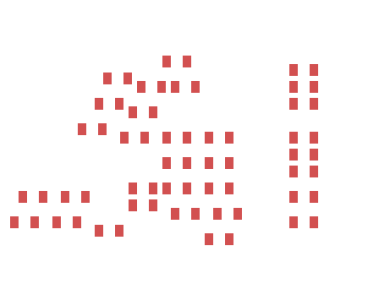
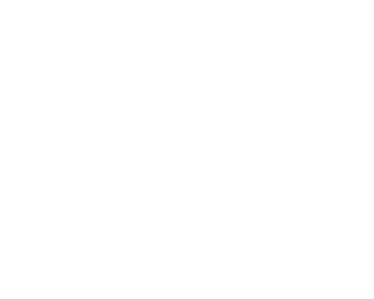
part: (176, 61) -> none
part: (303, 69) -> none
part: (117, 78) -> none
part: (151, 86) -> none
part: (185, 86) -> none
part: (303, 86) -> none
part: (109, 103) -> none
part: (303, 103) -> none
part: (142, 112) -> none
part: (92, 129) -> none
part: (134, 137) -> none
part: (176, 137) -> none
part: (219, 137) -> none
part: (303, 137) -> none
part: (303, 154) -> none
part: (176, 163) -> none
part: (219, 163) -> none
part: (303, 171) -> none
part: (142, 188) -> none
part: (176, 188) -> none
part: (219, 188) -> none
part: (32, 196) -> none
part: (75, 196) -> none
part: (303, 196) -> none
part: (142, 205) -> none
part: (185, 213) -> none
part: (227, 213) -> none
part: (24, 222) -> none
part: (66, 222) -> none
part: (303, 222) -> none
part: (109, 230) -> none
part: (219, 239) -> none

